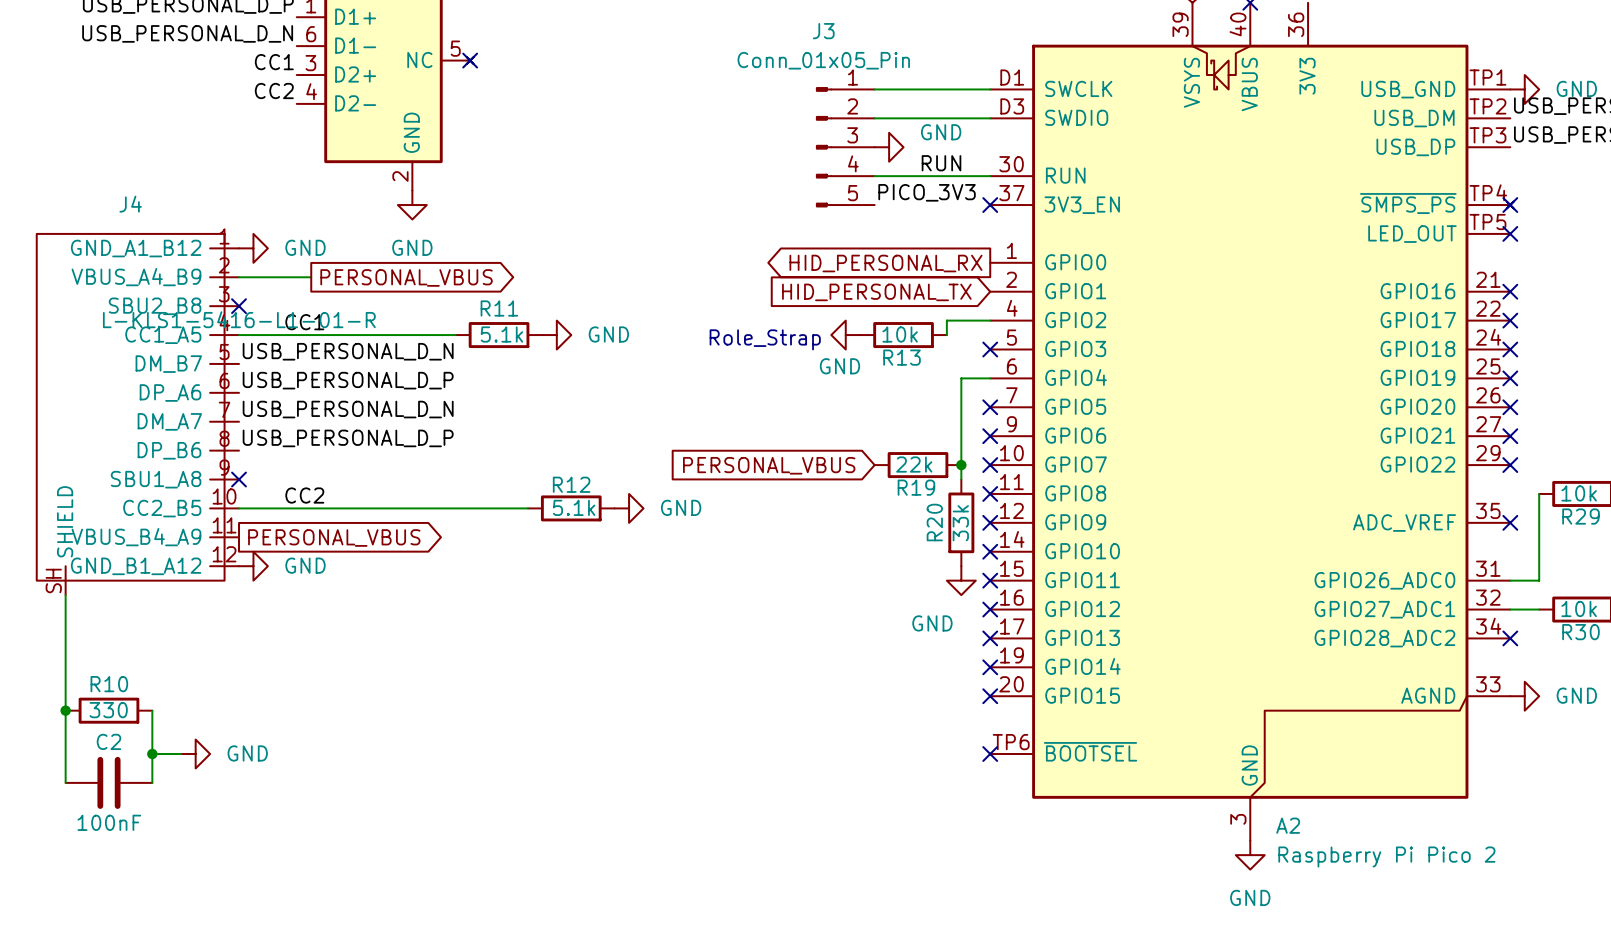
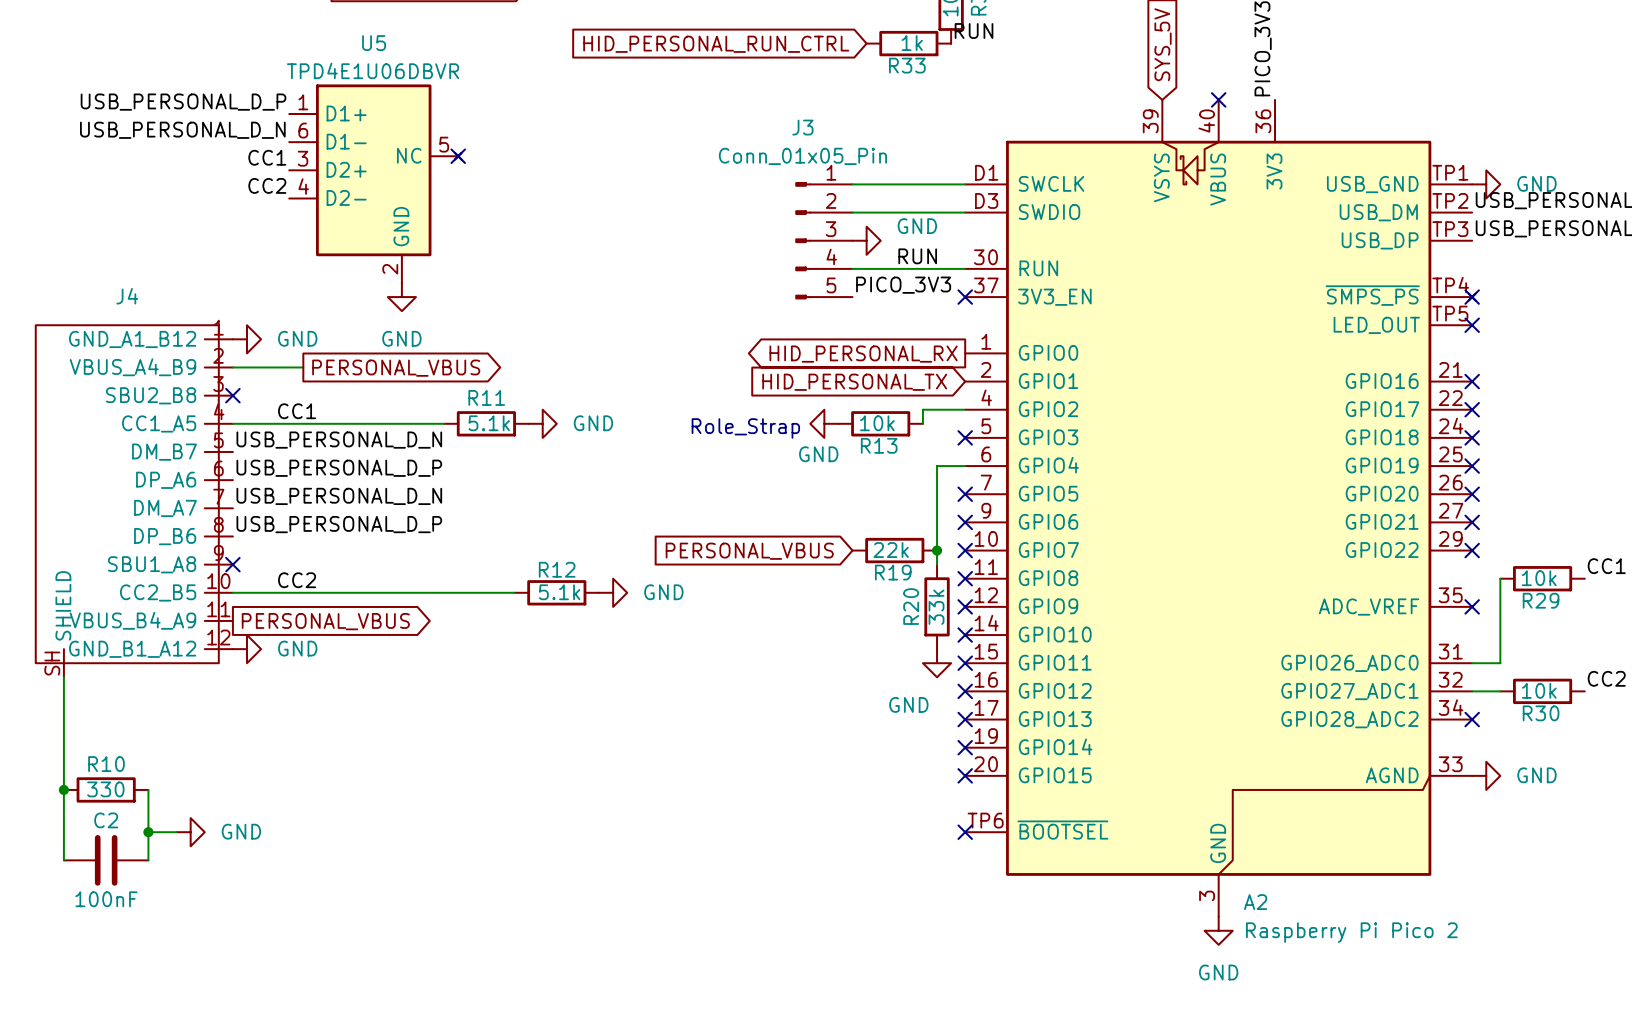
J4 value: L-KLS1-5416-L1-01-R (239, 319) -> none

